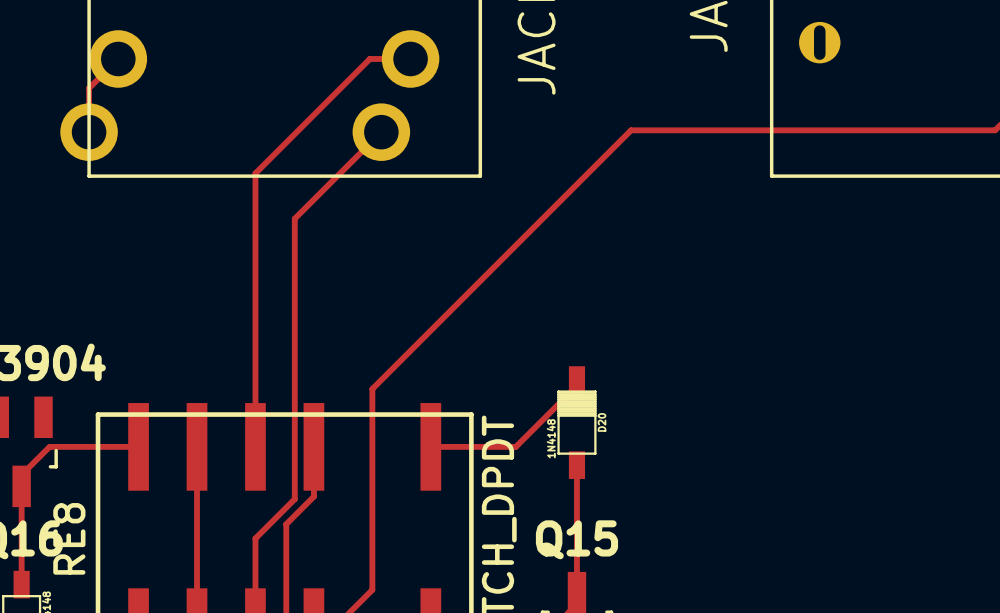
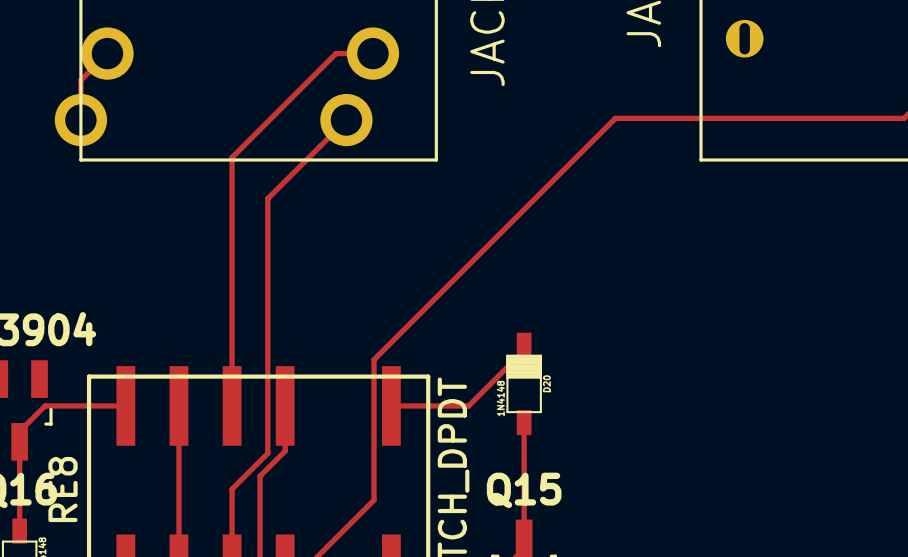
top track: (677, 130) (631, 130) (372, 388) (372, 589) -> (615, 118) (374, 359) (374, 500) (338, 535)

